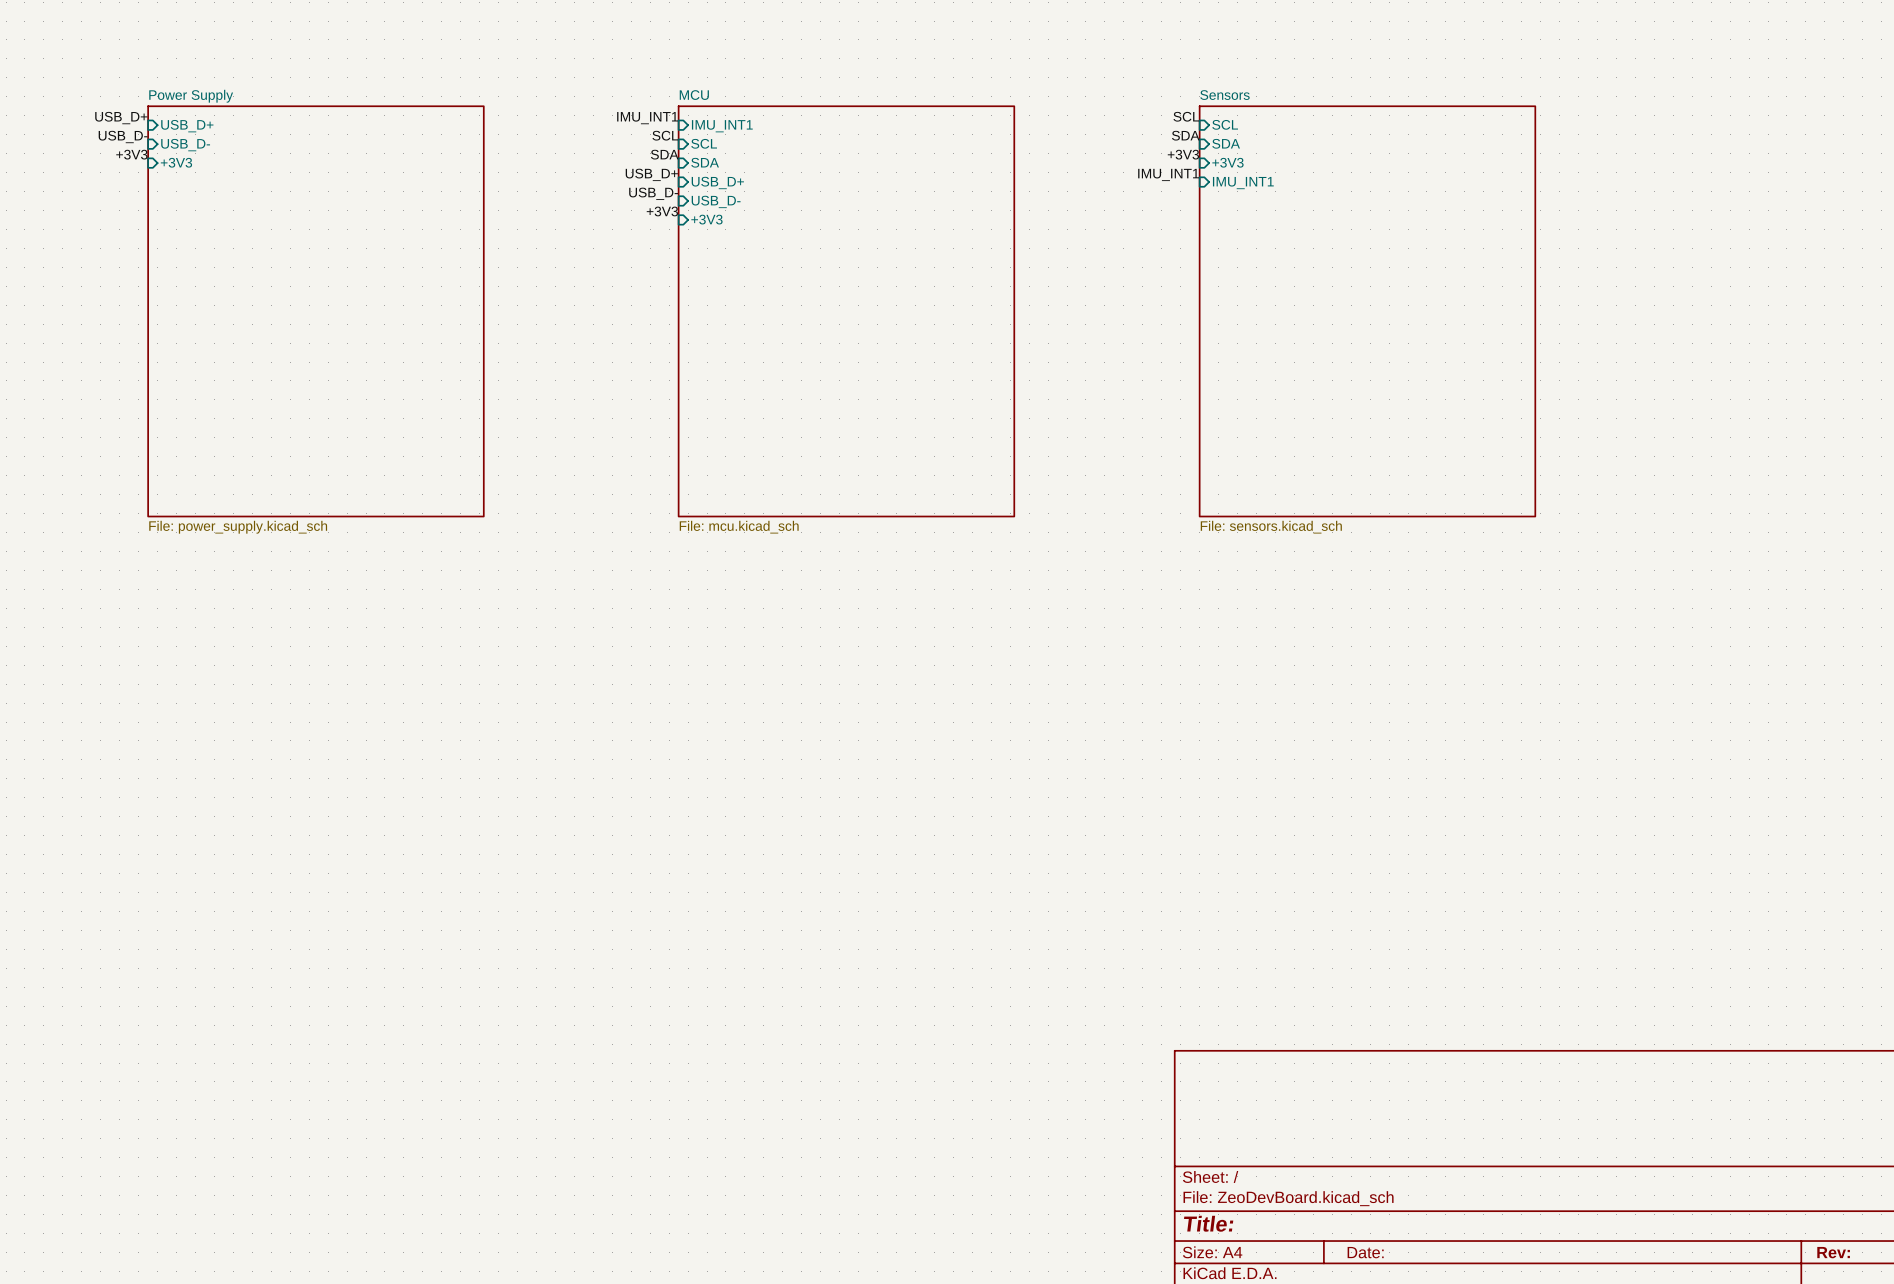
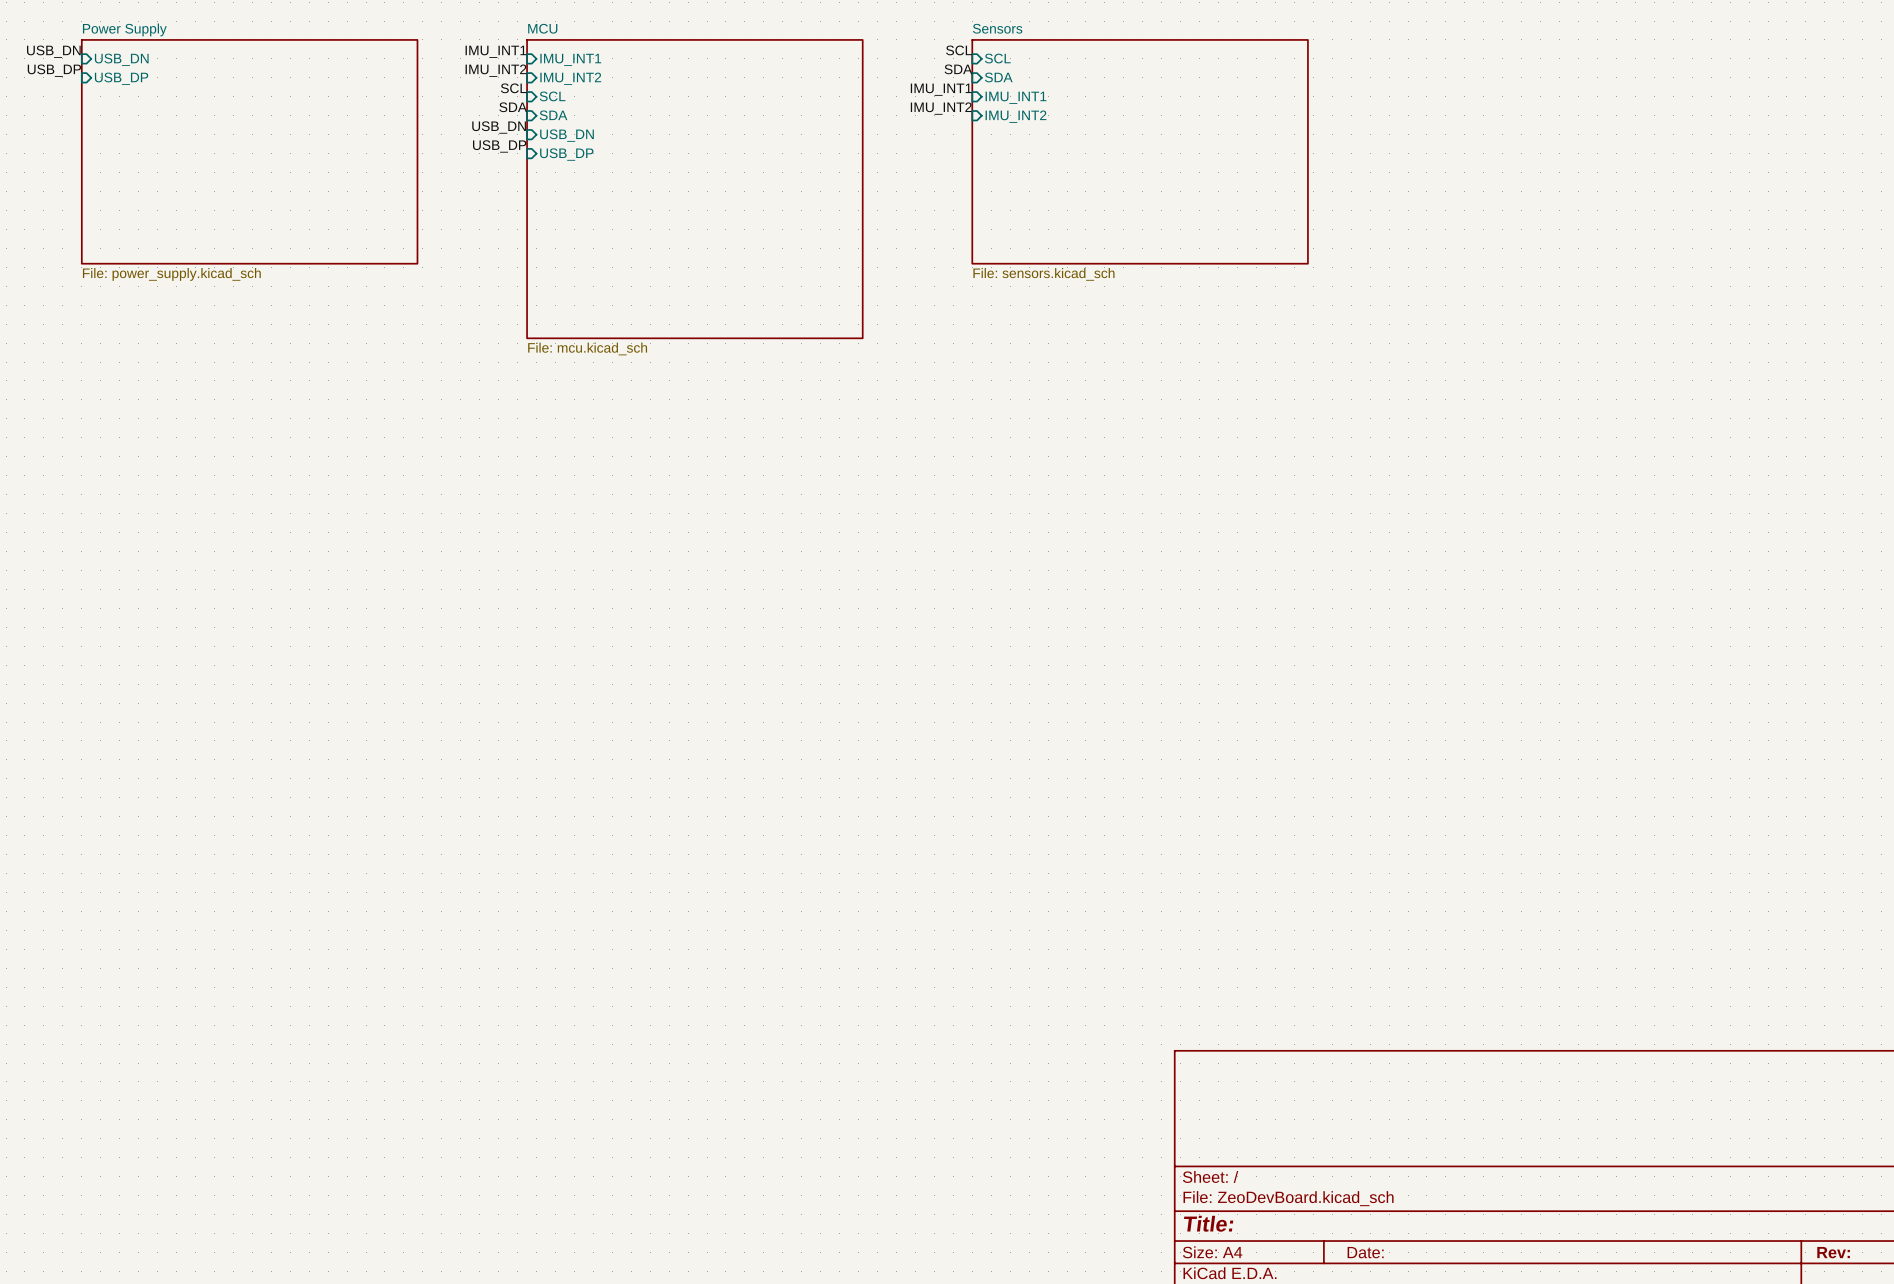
label: none -> SCL (958, 50)
label: none -> USB_DN (53, 51)
label: none -> IMU_INT1 (495, 51)
sheet pin: none -> SCL (997, 58)
sheet pin: none -> USB_DN (121, 59)
sheet pin: none -> IMU_INT1 (570, 59)
label: none -> SDA (958, 69)
label: none -> USB_DP (54, 70)
label: none -> IMU_INT2 (495, 70)
sheet pin: none -> SDA (998, 77)
sheet pin: none -> USB_DP (121, 78)
sheet pin: none -> IMU_INT2 (570, 78)
label: none -> SCL (513, 88)
label: none -> IMU_INT1 (941, 89)
sheet pin: none -> SCL (552, 96)
sheet pin: none -> IMU_INT1 (1015, 97)
label: none -> SDA (513, 107)
label: none -> IMU_INT2 (941, 108)
sheet pin: none -> SDA (553, 115)
sheet pin: none -> IMU_INT2 (1015, 116)
label: SCL (1186, 116) -> none
label: USB_D+ (121, 118) -> none
label: IMU_INT1 (647, 118) -> none
sheet pin: SCL (1225, 124) -> none
sheet pin: USB_D+ (187, 126) -> none
sheet pin: IMU_INT1 (722, 126) -> none
label: none -> USB_DN (499, 127)
sheet pin: none -> USB_DN (566, 135)
label: SCL (665, 135) -> none
label: SDA (1185, 135) -> none
label: USB_D- (123, 136) -> none
sheet pin: SCL (704, 143) -> none
sheet pin: SDA (1226, 143) -> none
sheet pin: USB_D- (185, 145) -> none
label: none -> USB_DP (499, 146)
sheet Power Supply: none -> File: power_supply.kicad_sch (249, 151)
sheet Sensors: none -> File: sensors.kicad_sch (1140, 151)
label: +3V3 (131, 154) -> none
sheet pin: none -> USB_DP (566, 154)
label: SDA (664, 154) -> none
label: +3V3 (1183, 154) -> none
sheet pin: +3V3 (176, 162) -> none
sheet pin: SDA (705, 162) -> none
sheet pin: +3V3 (1227, 162) -> none
label: USB_D+ (651, 174) -> none
label: IMU_INT1 (1168, 174) -> none
sheet pin: USB_D+ (717, 182) -> none
sheet pin: IMU_INT1 (1243, 183) -> none
sheet MCU: none -> File: mcu.kicad_sch (694, 189)
label: USB_D- (653, 193) -> none
sheet pin: USB_D- (716, 201) -> none
label: +3V3 (662, 211) -> none
sheet pin: +3V3 (706, 219) -> none
sheet Power Supply: File: power_supply.kicad_sch (315, 311) -> none
sheet MCU: File: mcu.kicad_sch (846, 311) -> none
sheet Sensors: File: sensors.kicad_sch (1367, 311) -> none

